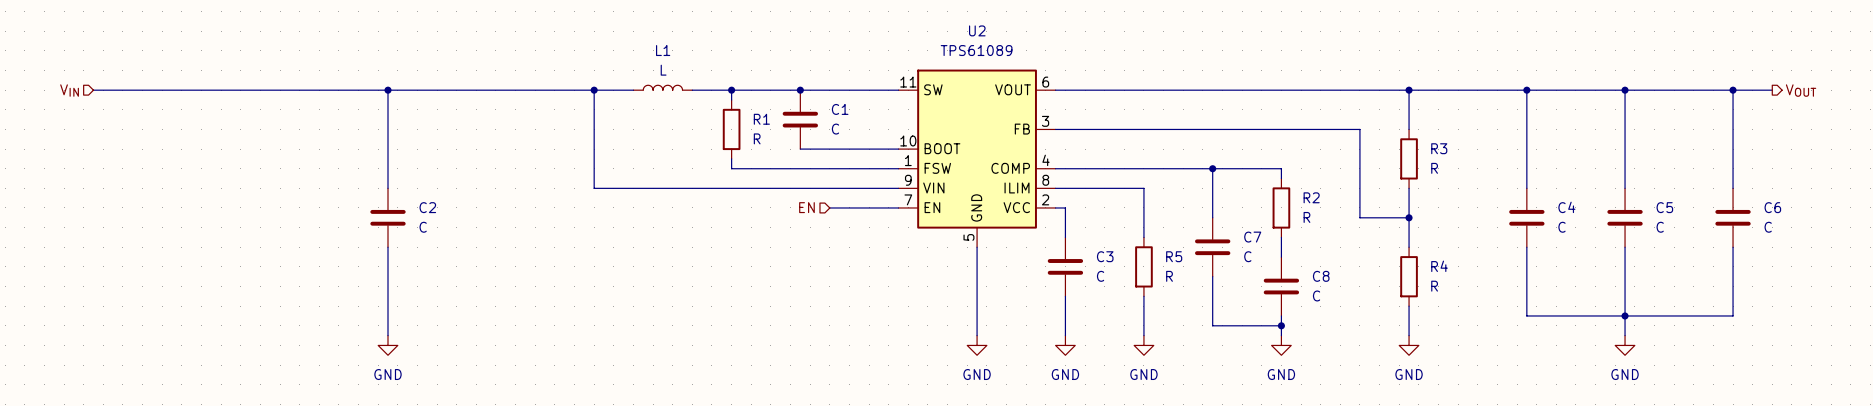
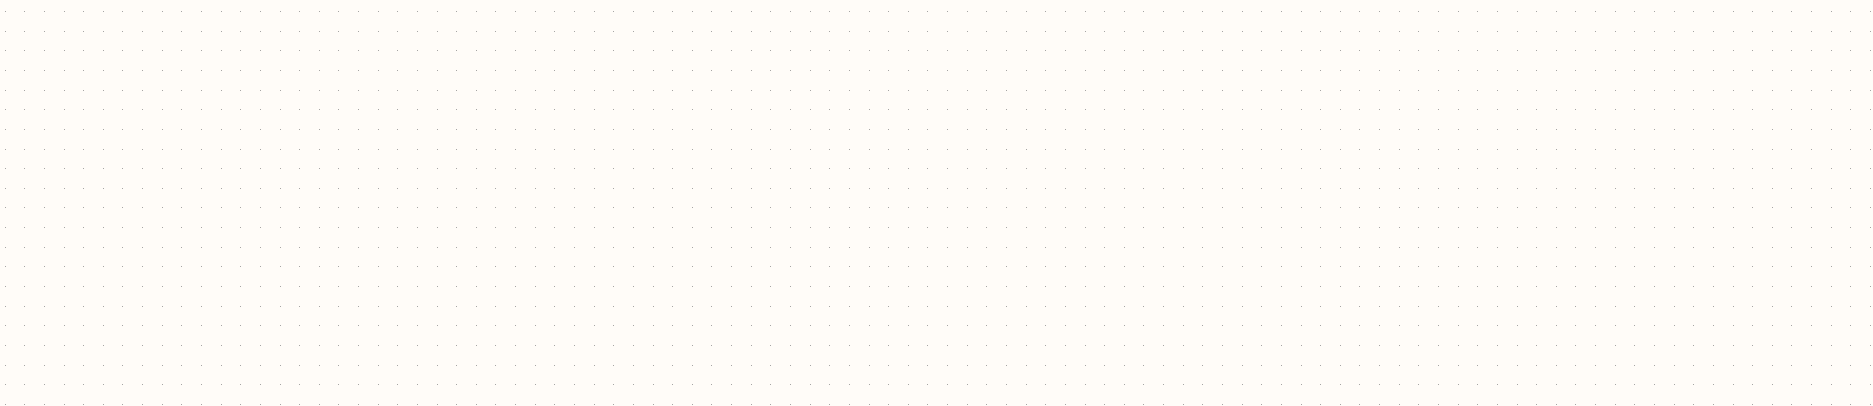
L1: L (662, 87) -> none
hierarchical label: VIN (69, 90) -> none
wire: (93, 90) (633, 90) -> none
wire: (388, 90) (388, 188) -> none
junction: (388, 90) -> none
wire: (594, 90) (594, 188) (898, 188) -> none
junction: (594, 90) -> none
wire: (692, 90) (898, 90) -> none
wire: (731, 90) (731, 99) -> none
junction: (731, 90) -> none
junction: (800, 90) -> none
wire: (1055, 90) (1772, 90) -> none
wire: (1409, 90) (1409, 129) -> none
junction: (1409, 90) -> none
wire: (1526, 90) (1526, 188) -> none
junction: (1526, 90) -> none
wire: (1625, 90) (1625, 188) -> none
junction: (1625, 90) -> none
wire: (1733, 90) (1733, 188) -> none
junction: (1733, 90) -> none
hierarchical label: VOUT (1801, 90) -> none
C1: C (800, 119) -> none
R1: R (731, 129) -> none
wire: (1055, 129) (1359, 129) (1359, 217) (1409, 217) -> none
wire: (800, 149) (898, 149) -> none
wire: (731, 158) (731, 168) (898, 168) -> none
U2: TPS61089 (977, 158) -> none
R3: R (1409, 158) -> none
wire: (1055, 168) (1281, 168) (1281, 178) -> none
wire: (1212, 168) (1212, 217) -> none
junction: (1212, 168) -> none
wire: (1055, 188) (1143, 188) (1143, 237) -> none
wire: (1409, 188) (1409, 247) -> none
hierarchical label: EN (806, 207) -> none
wire: (829, 207) (898, 207) -> none
wire: (1055, 207) (1065, 207) (1065, 237) -> none
R2: R (1281, 207) -> none
C2: C (388, 217) -> none
junction: (1409, 217) -> none
C4: C (1526, 217) -> none
C5: C (1625, 217) -> none
C6: C (1733, 217) -> none
wire: (1281, 237) (1281, 257) -> none
wire: (388, 247) (388, 335) -> none
wire: (977, 247) (977, 335) -> none
C7: C (1212, 247) -> none
wire: (1526, 247) (1526, 315) (1733, 315) (1733, 247) -> none
wire: (1625, 247) (1625, 335) -> none
C3: C (1065, 266) -> none
R5: R (1143, 266) -> none
wire: (1212, 276) (1212, 325) (1281, 325) -> none
R4: R (1409, 276) -> none
C8: C (1281, 286) -> none
wire: (1065, 296) (1065, 335) -> none
wire: (1143, 296) (1143, 335) -> none
wire: (1409, 306) (1409, 335) -> none
wire: (1281, 315) (1281, 335) -> none
junction: (1625, 315) -> none
junction: (1281, 325) -> none
power symbol: GND (388, 345) -> none
power symbol: GND (977, 345) -> none
power symbol: GND (1065, 345) -> none
power symbol: GND (1143, 345) -> none
power symbol: GND (1281, 345) -> none
power symbol: GND (1409, 345) -> none
power symbol: GND (1625, 345) -> none

